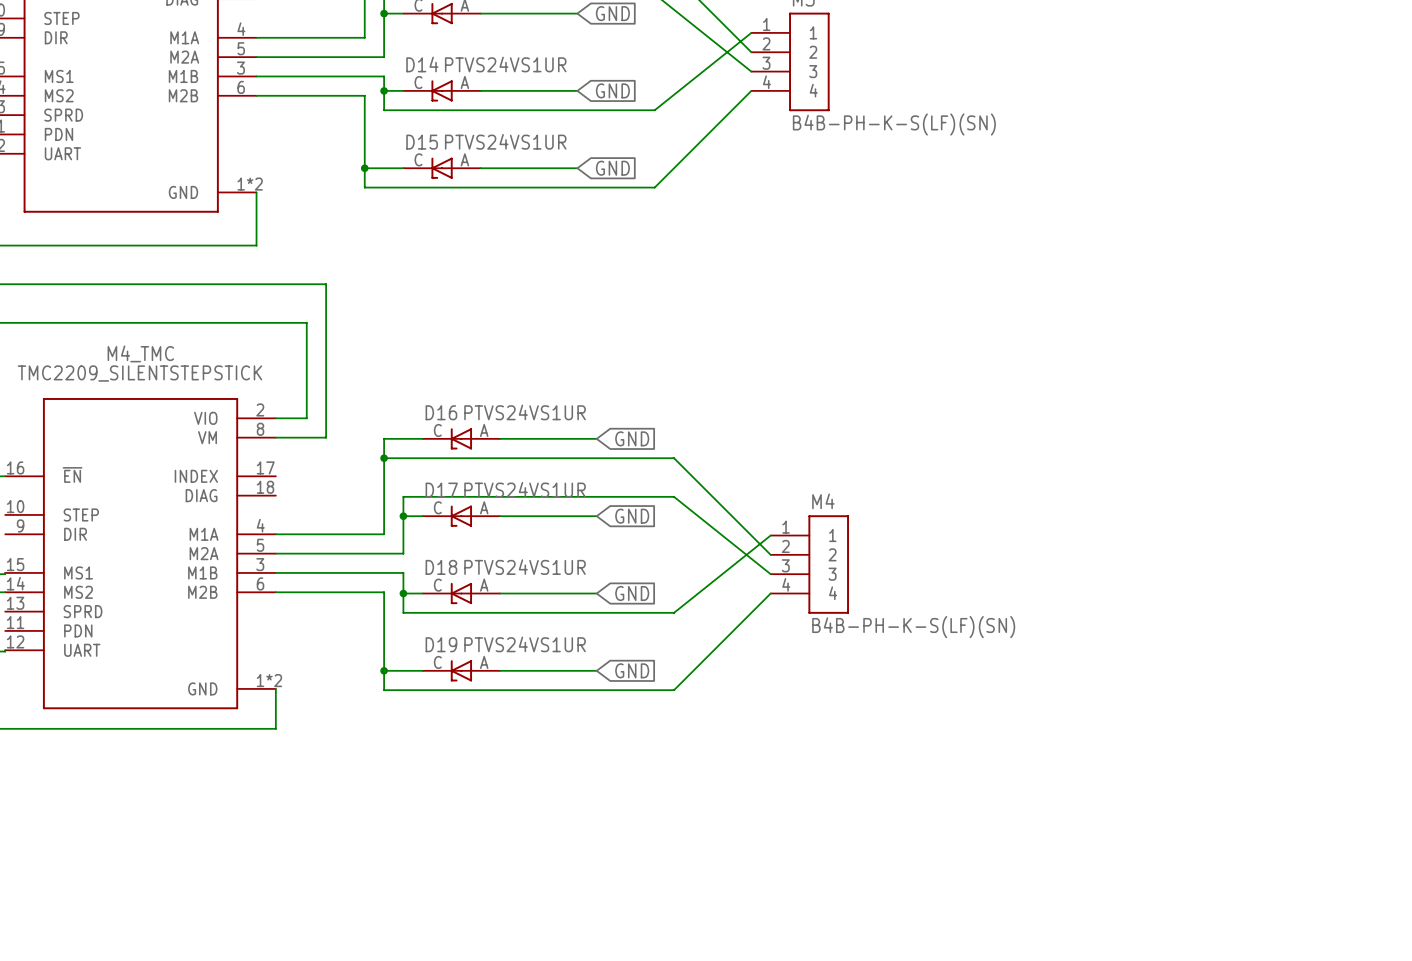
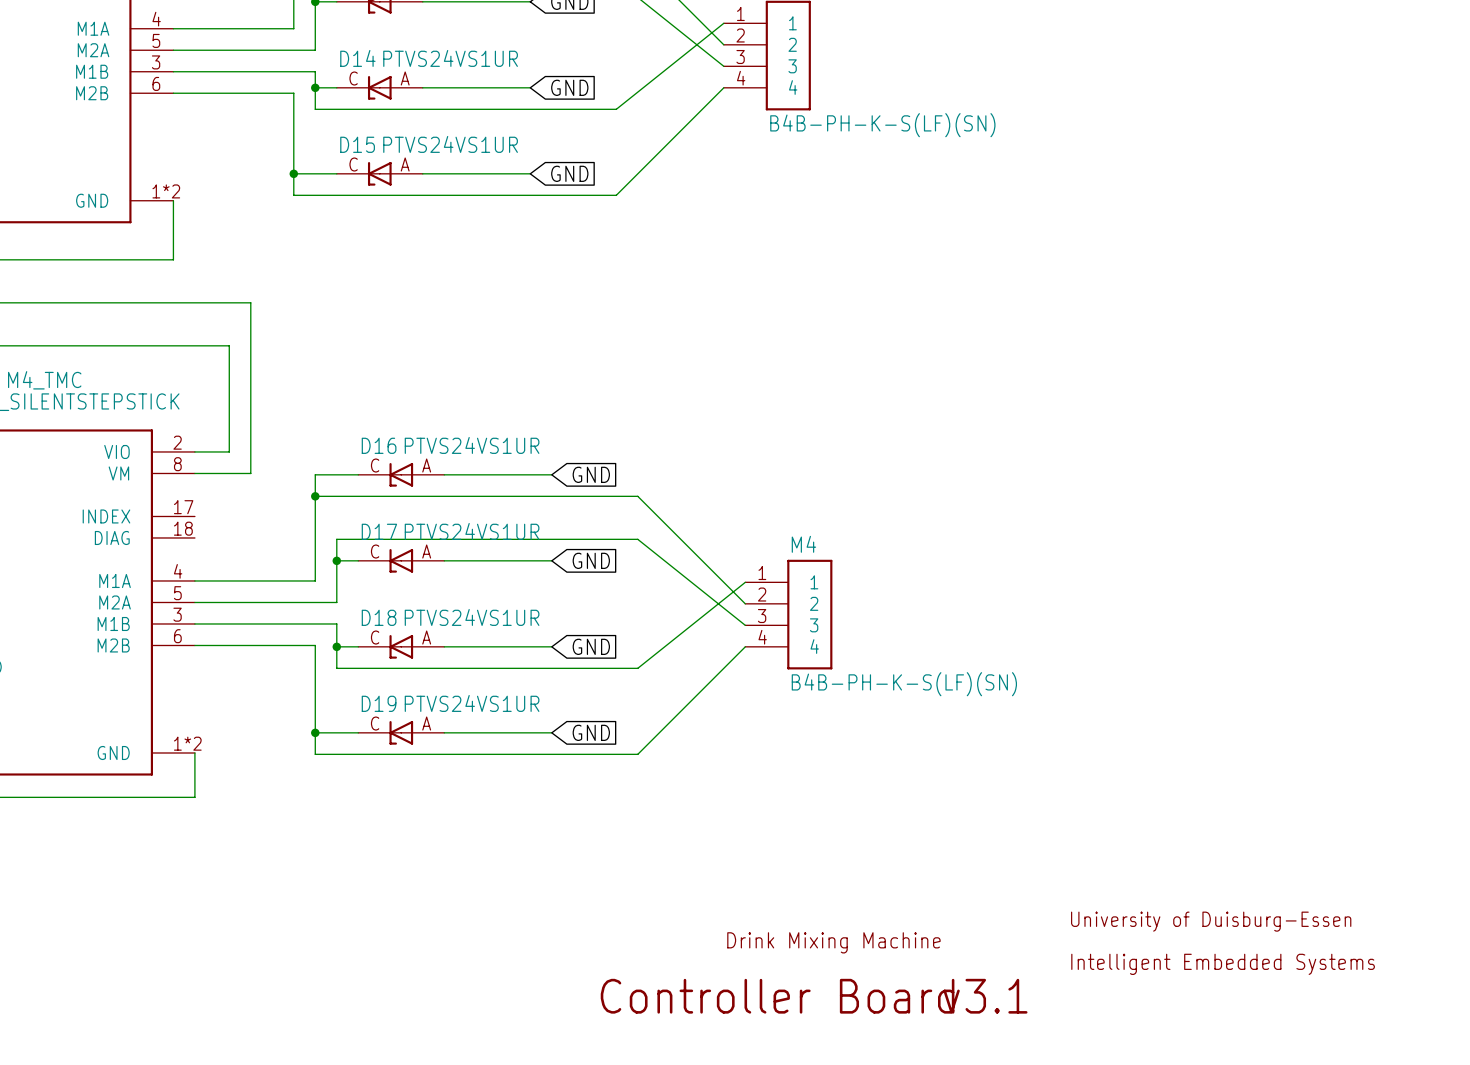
text: none -> University of Duisburg-Essen (1211, 921)
text: none -> Drink Mixing Machine (833, 942)
text: none -> Intelligent Embedded Systems (1223, 964)
text: none -> Controller Board (777, 996)
text: none -> v3.1 (985, 996)

